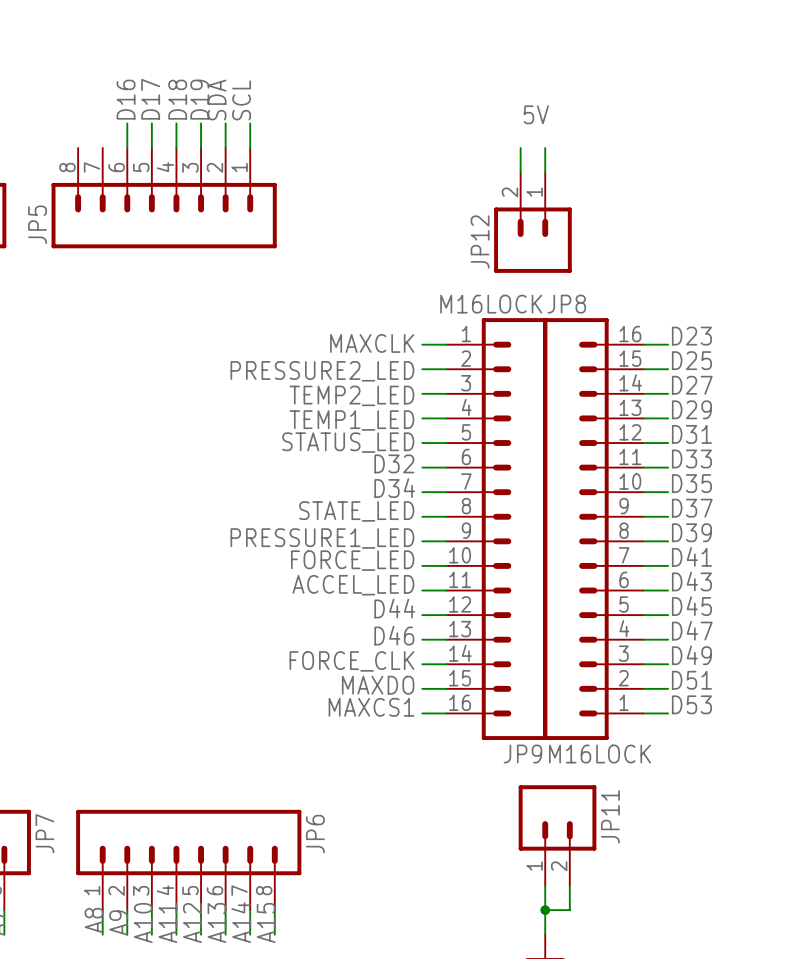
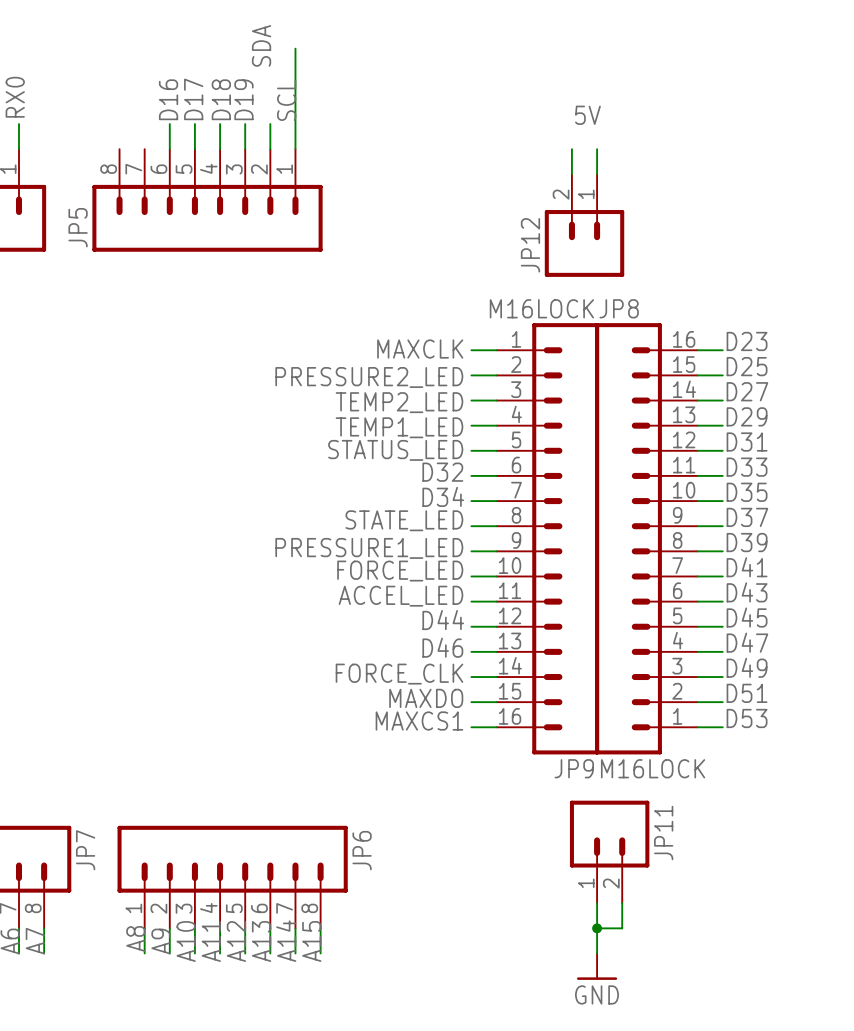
wire: none -> (295, 48) (295, 124)
label position: SDA (217, 100) -> SDA (261, 45)

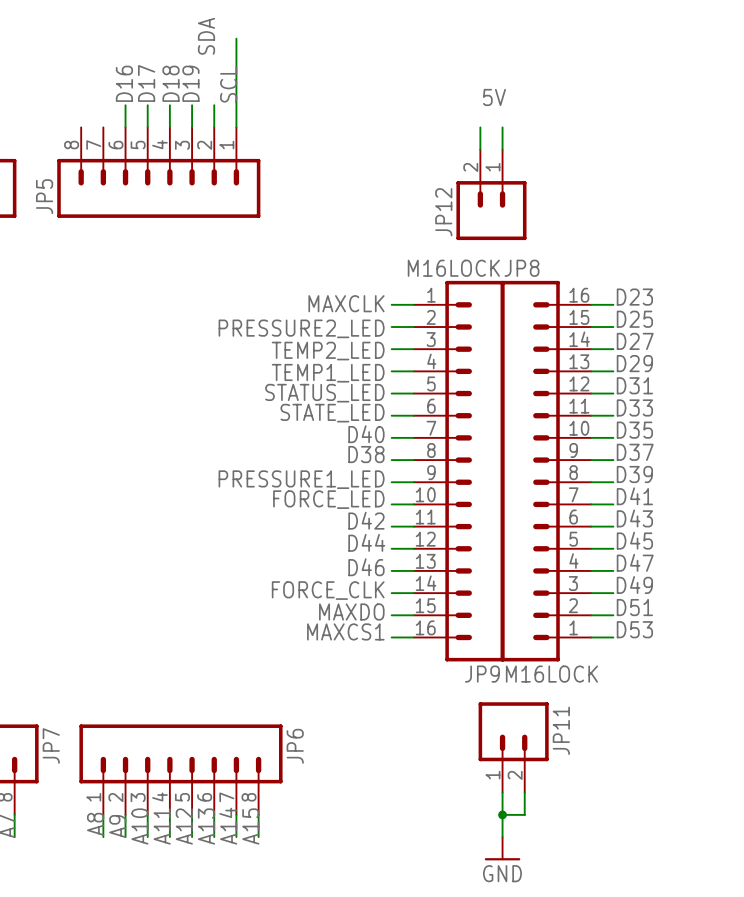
label: D32 (442, 472) -> STATE_LED (332, 413)
label: D34 (443, 496) -> D40 (366, 434)
label: STATE_LED (404, 520) -> D38 (366, 454)
label: ACCEL_LED (400, 596) -> D42 (366, 520)

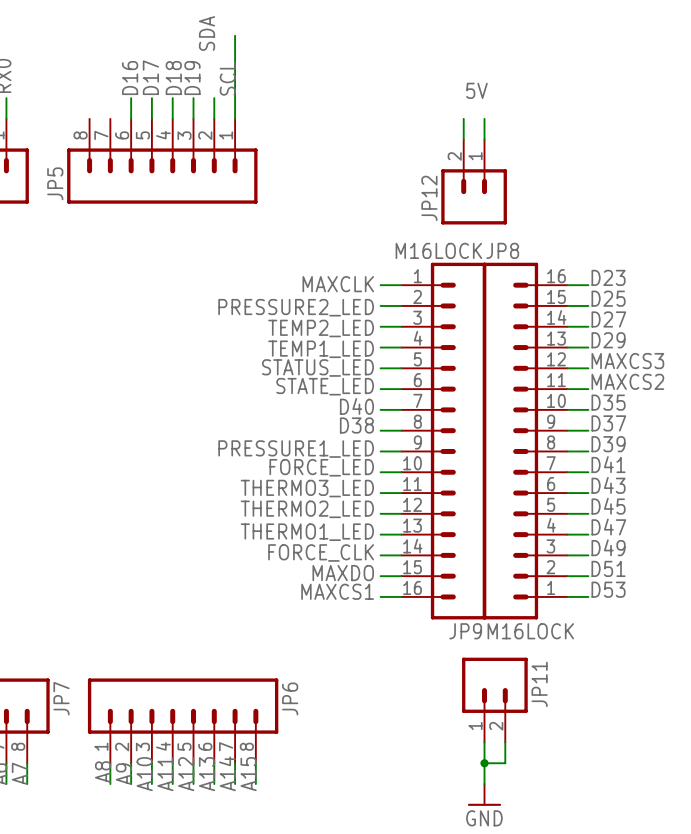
label: D31 (634, 385) -> MAXCS3 (627, 361)
label: D33 (634, 407) -> MAXCS2 (627, 381)
label: D42 (366, 520) -> THERMO3_LED (307, 488)
label: D44 (366, 542) -> THERMO2_LED (307, 509)
label: D46 (366, 567) -> THERMO1_LED (307, 532)

